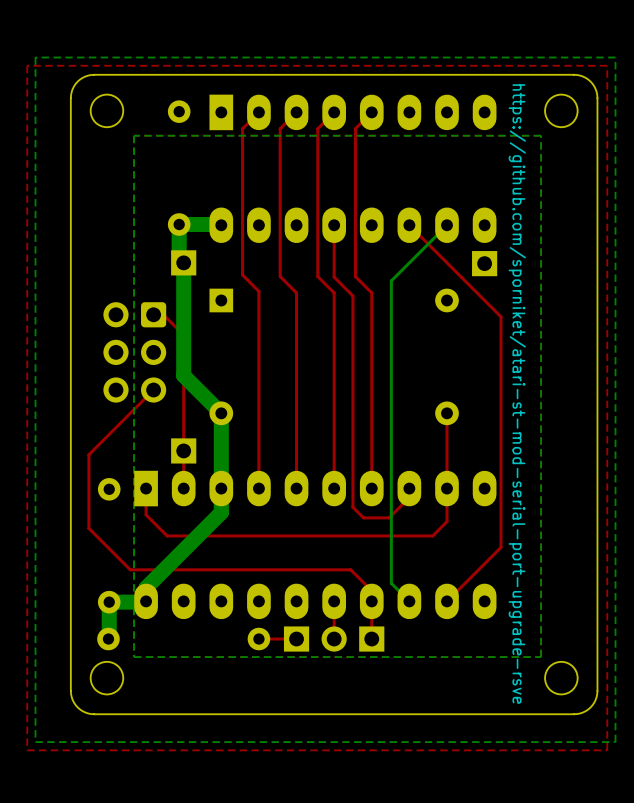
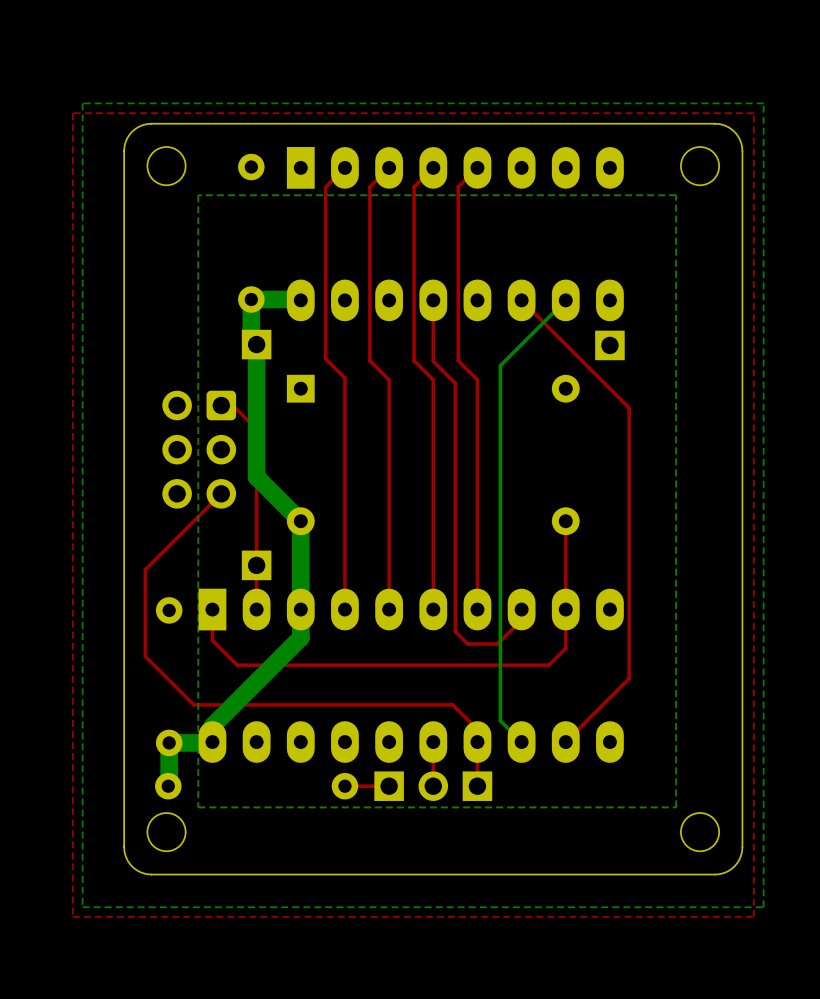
text: https://github.com/sporniket/atari-st-mod-serial-port-upgrade-rsve (517, 394) -> none

